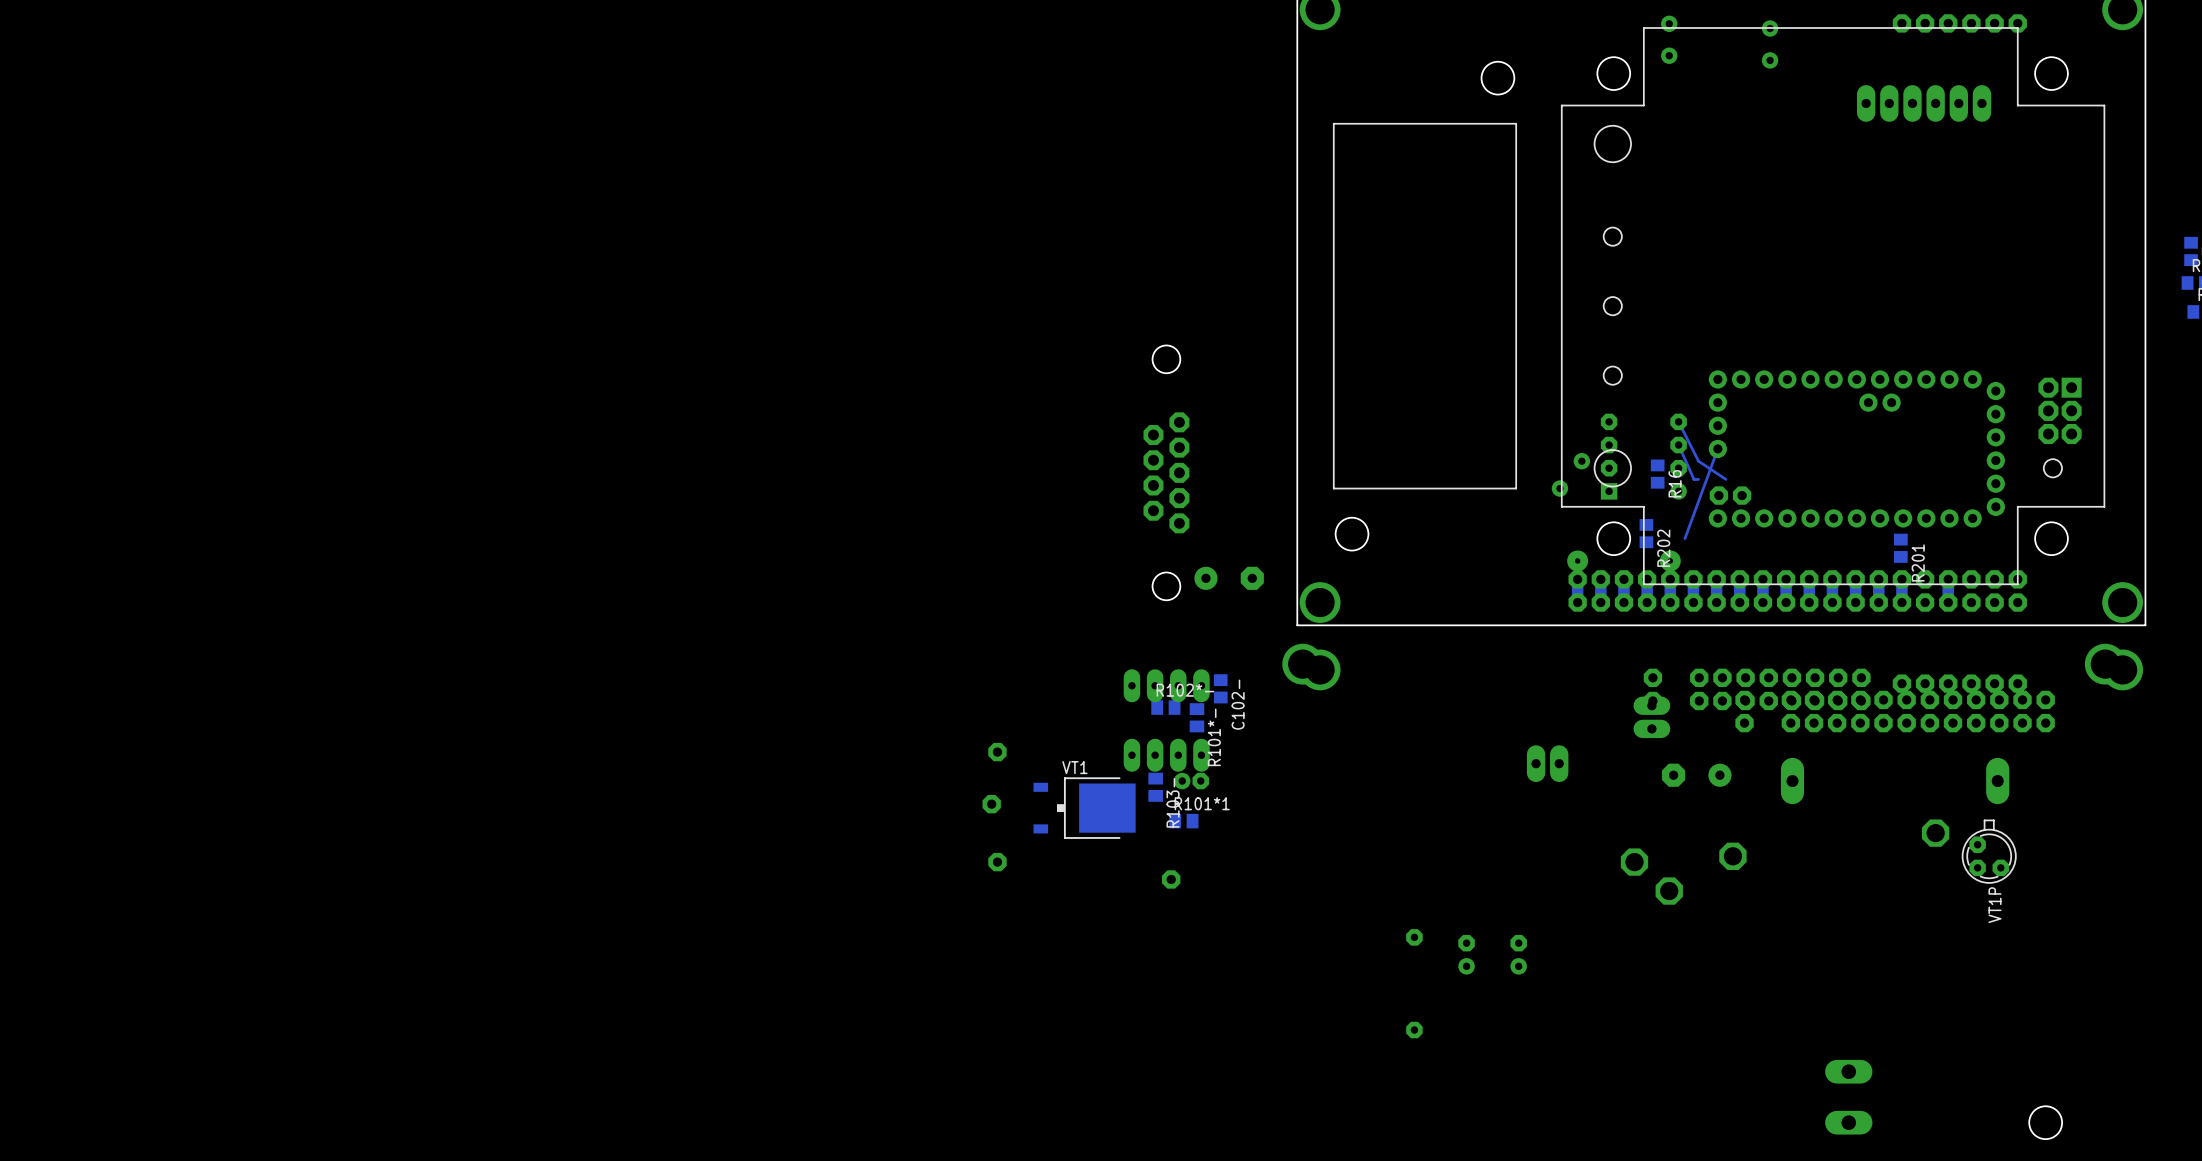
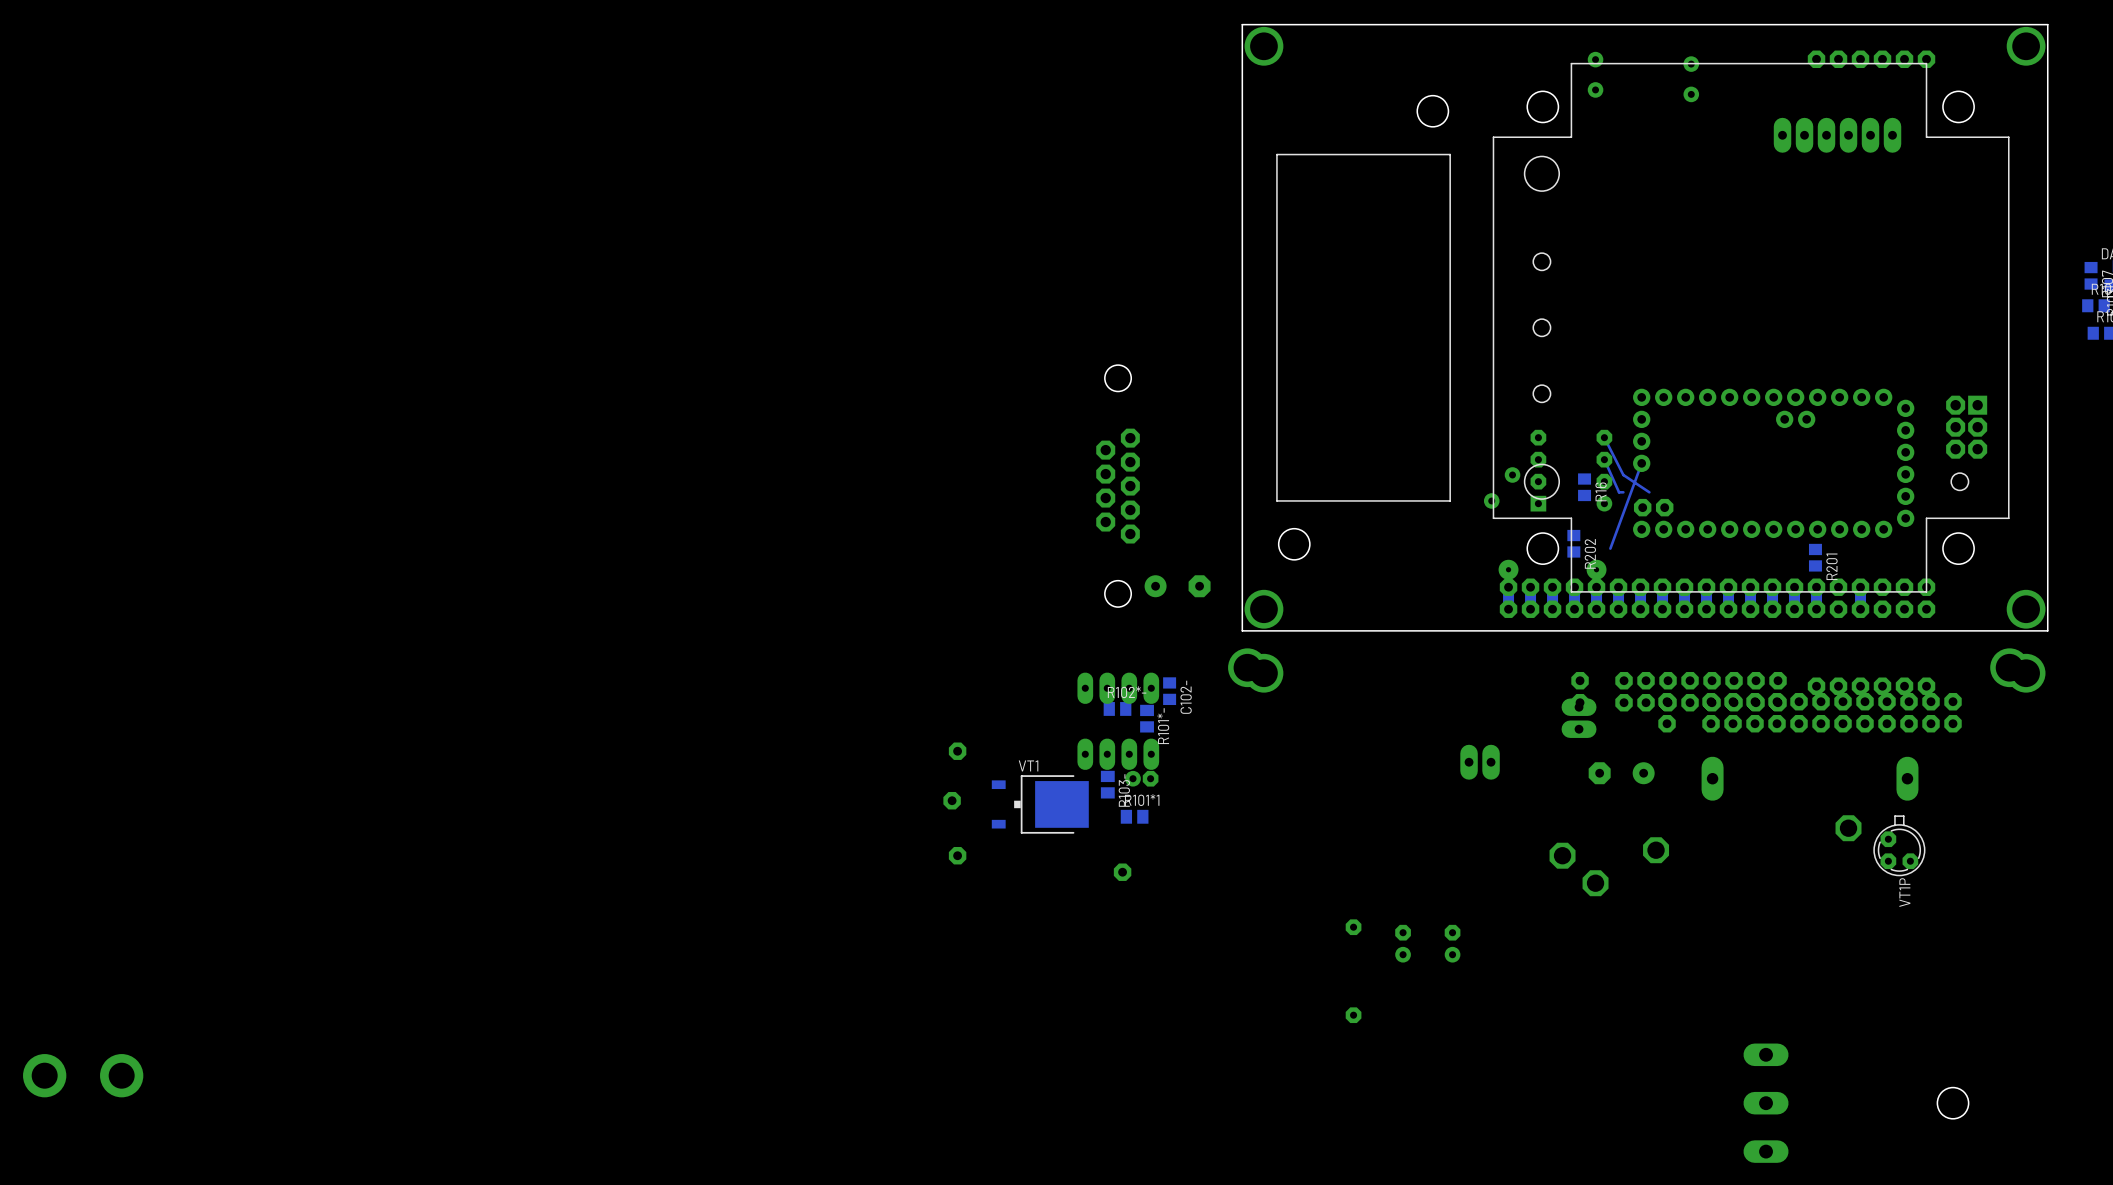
part: none -> (44, 1075)
part: none -> (121, 1075)

